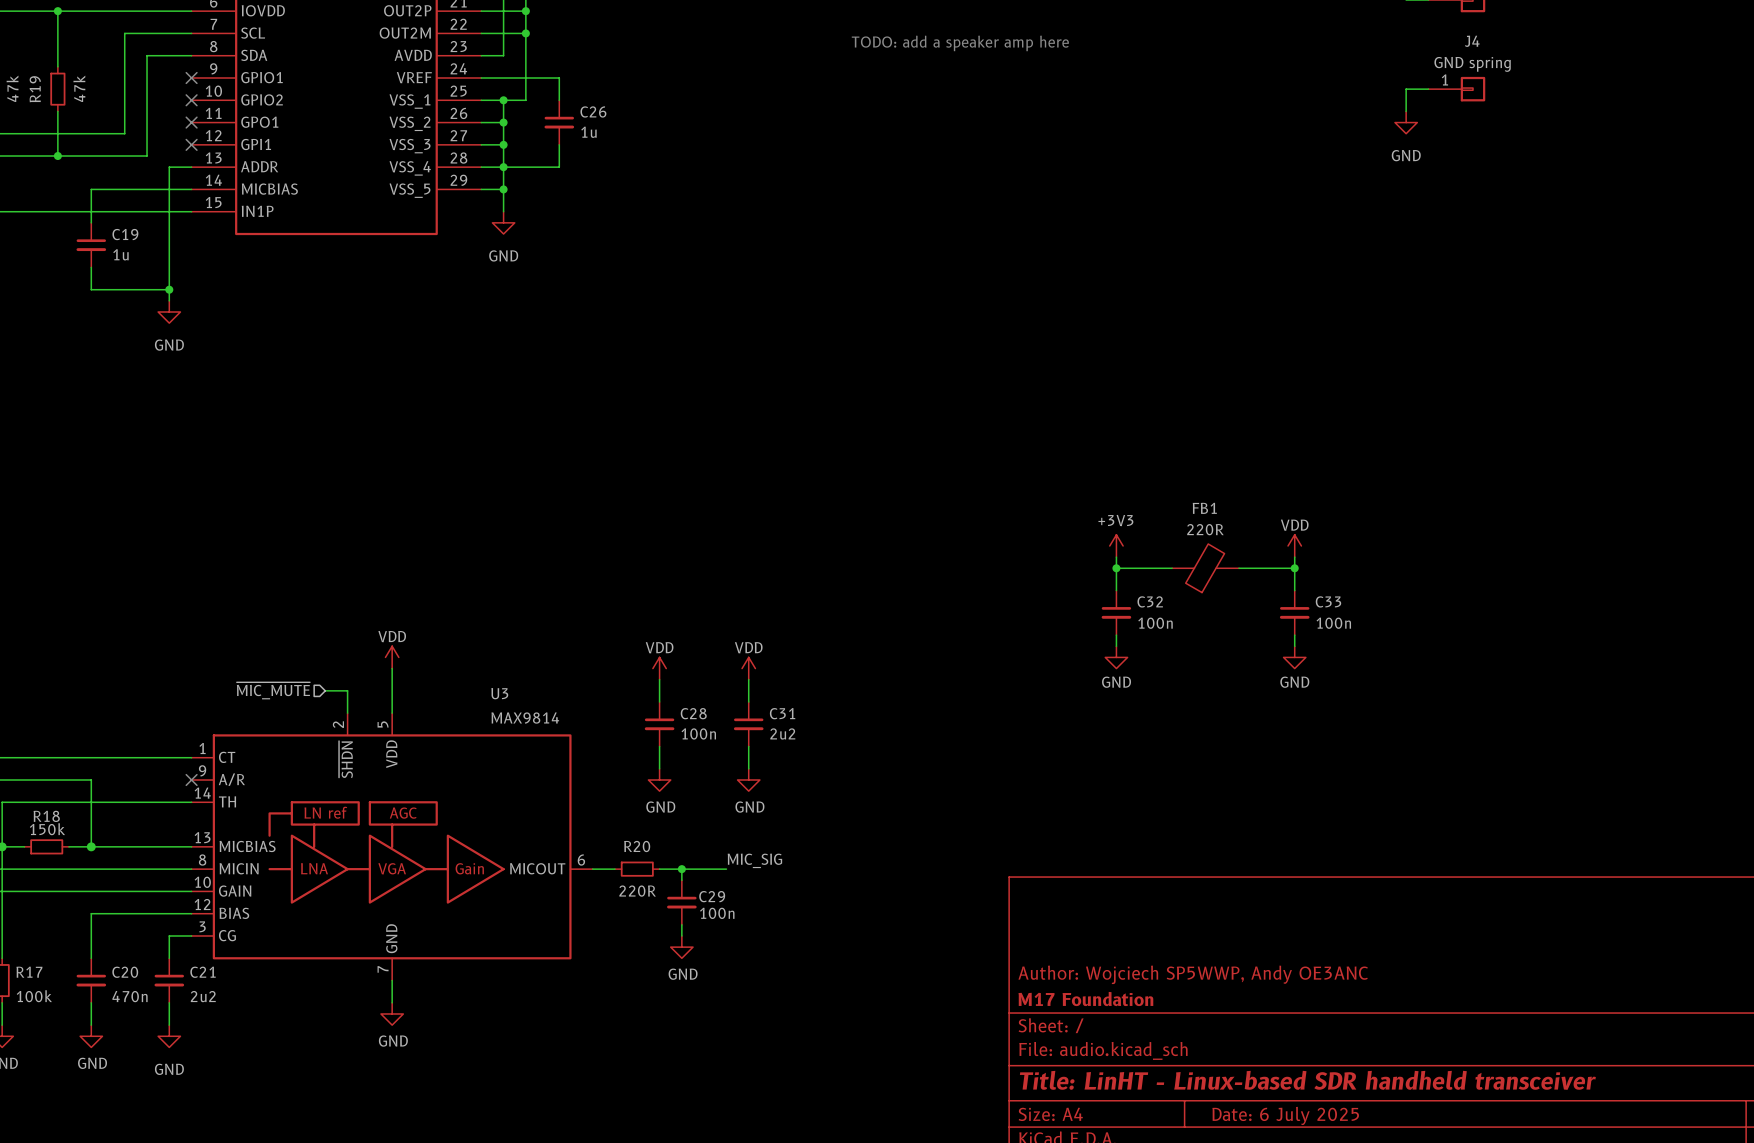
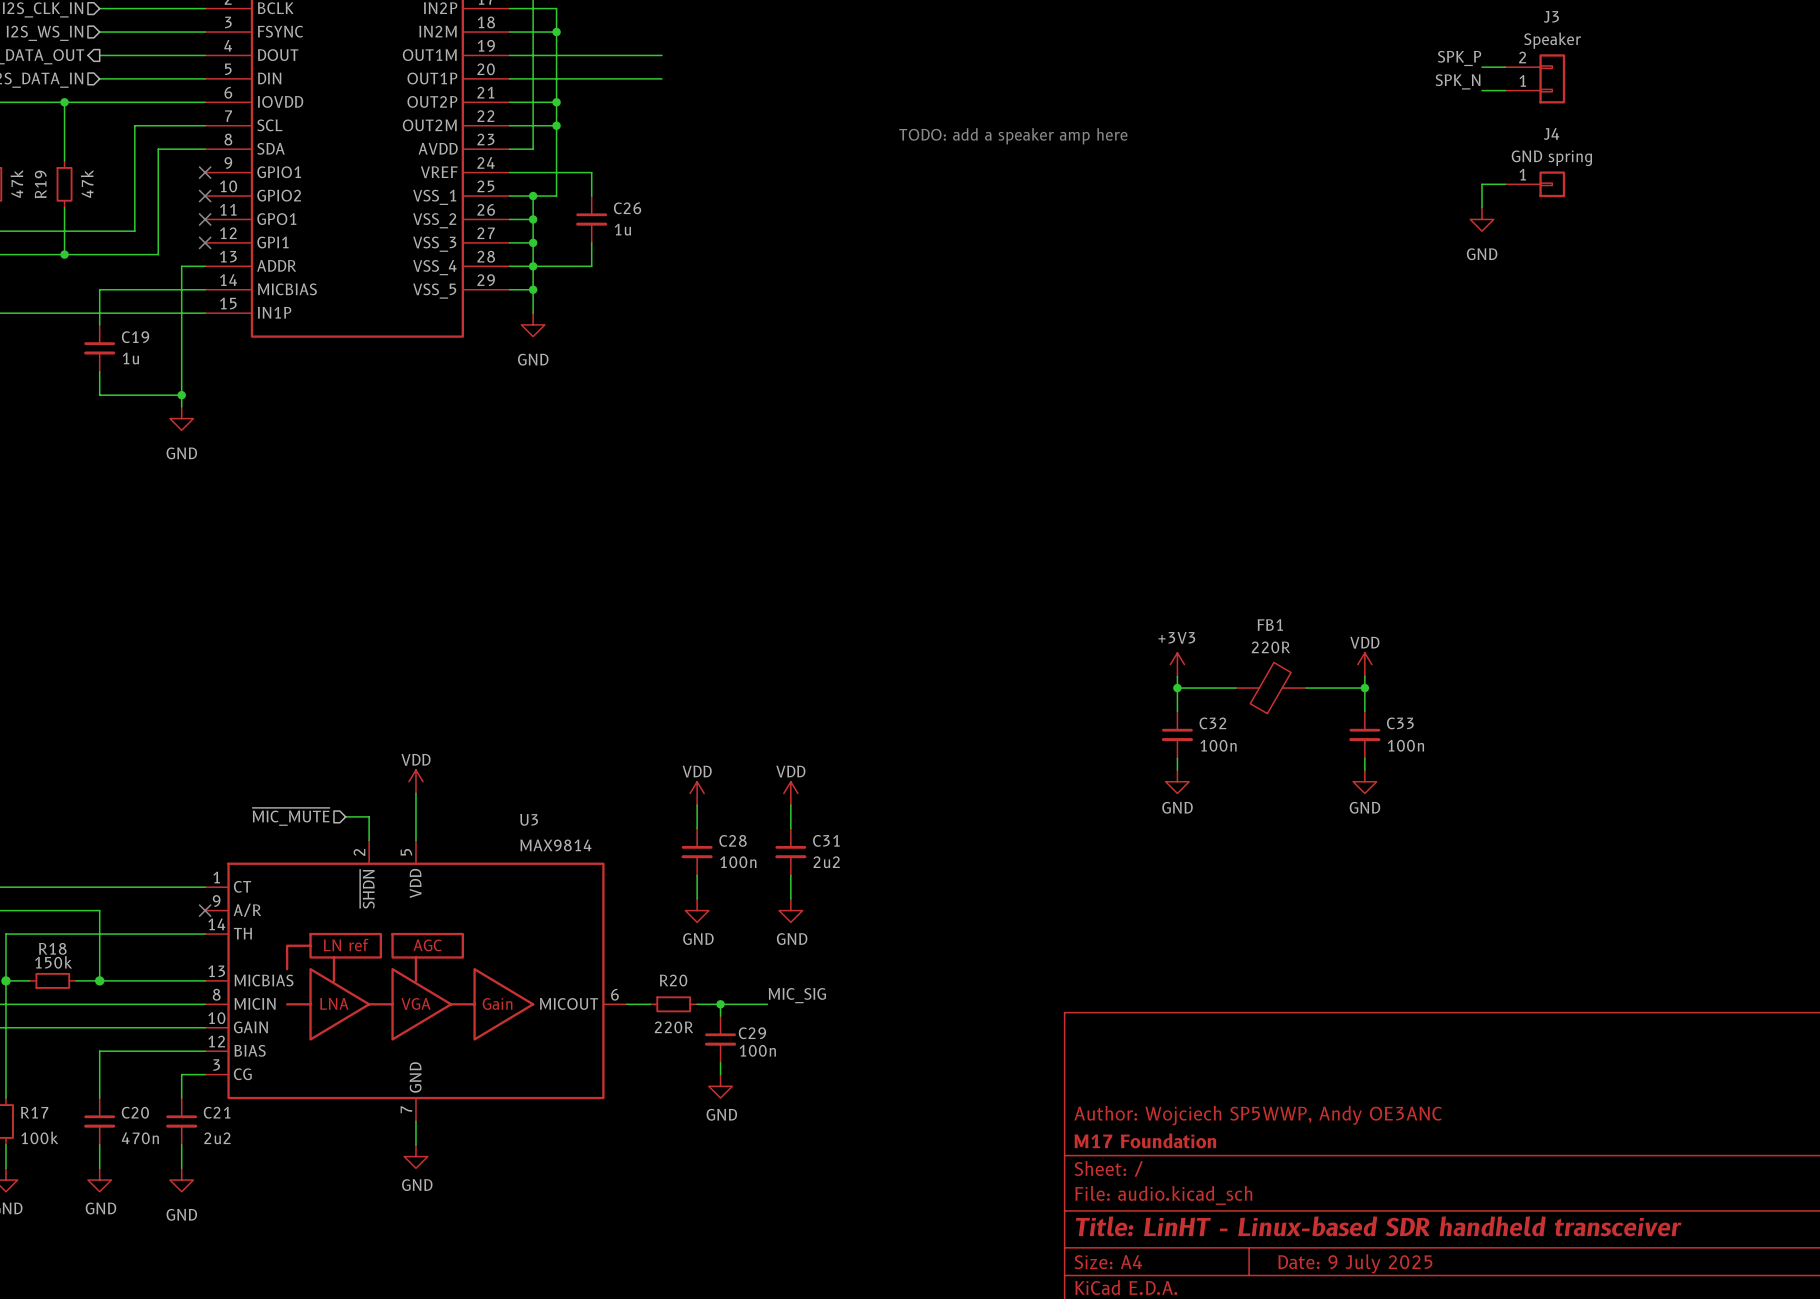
title block: Date: 6 July 2025 (1285, 1115) -> Date: 9 July 2025 (1355, 1263)

